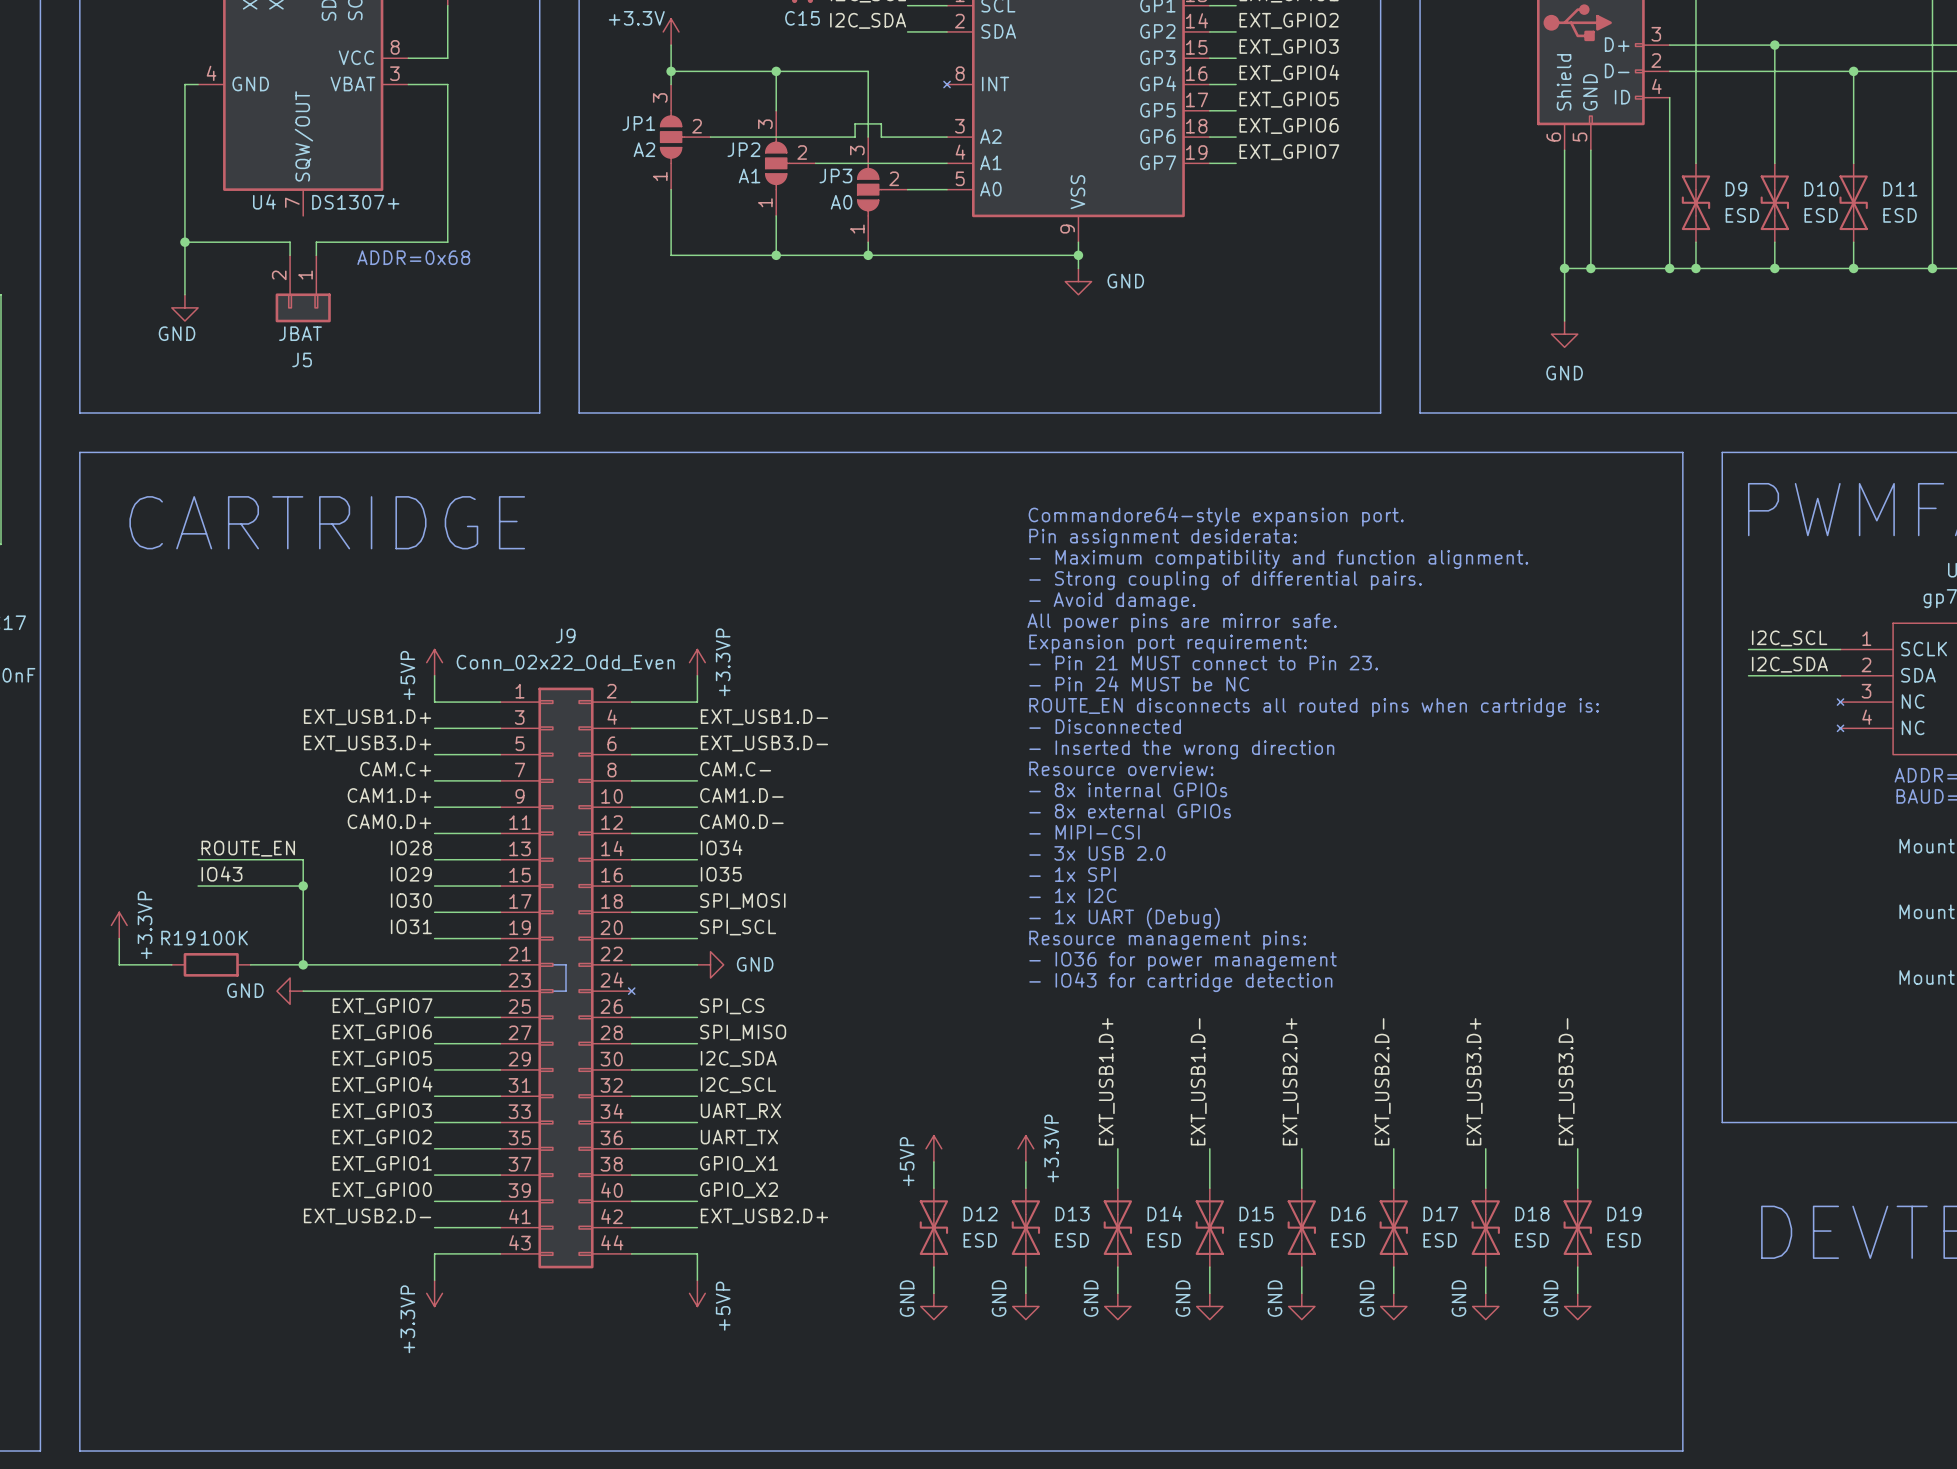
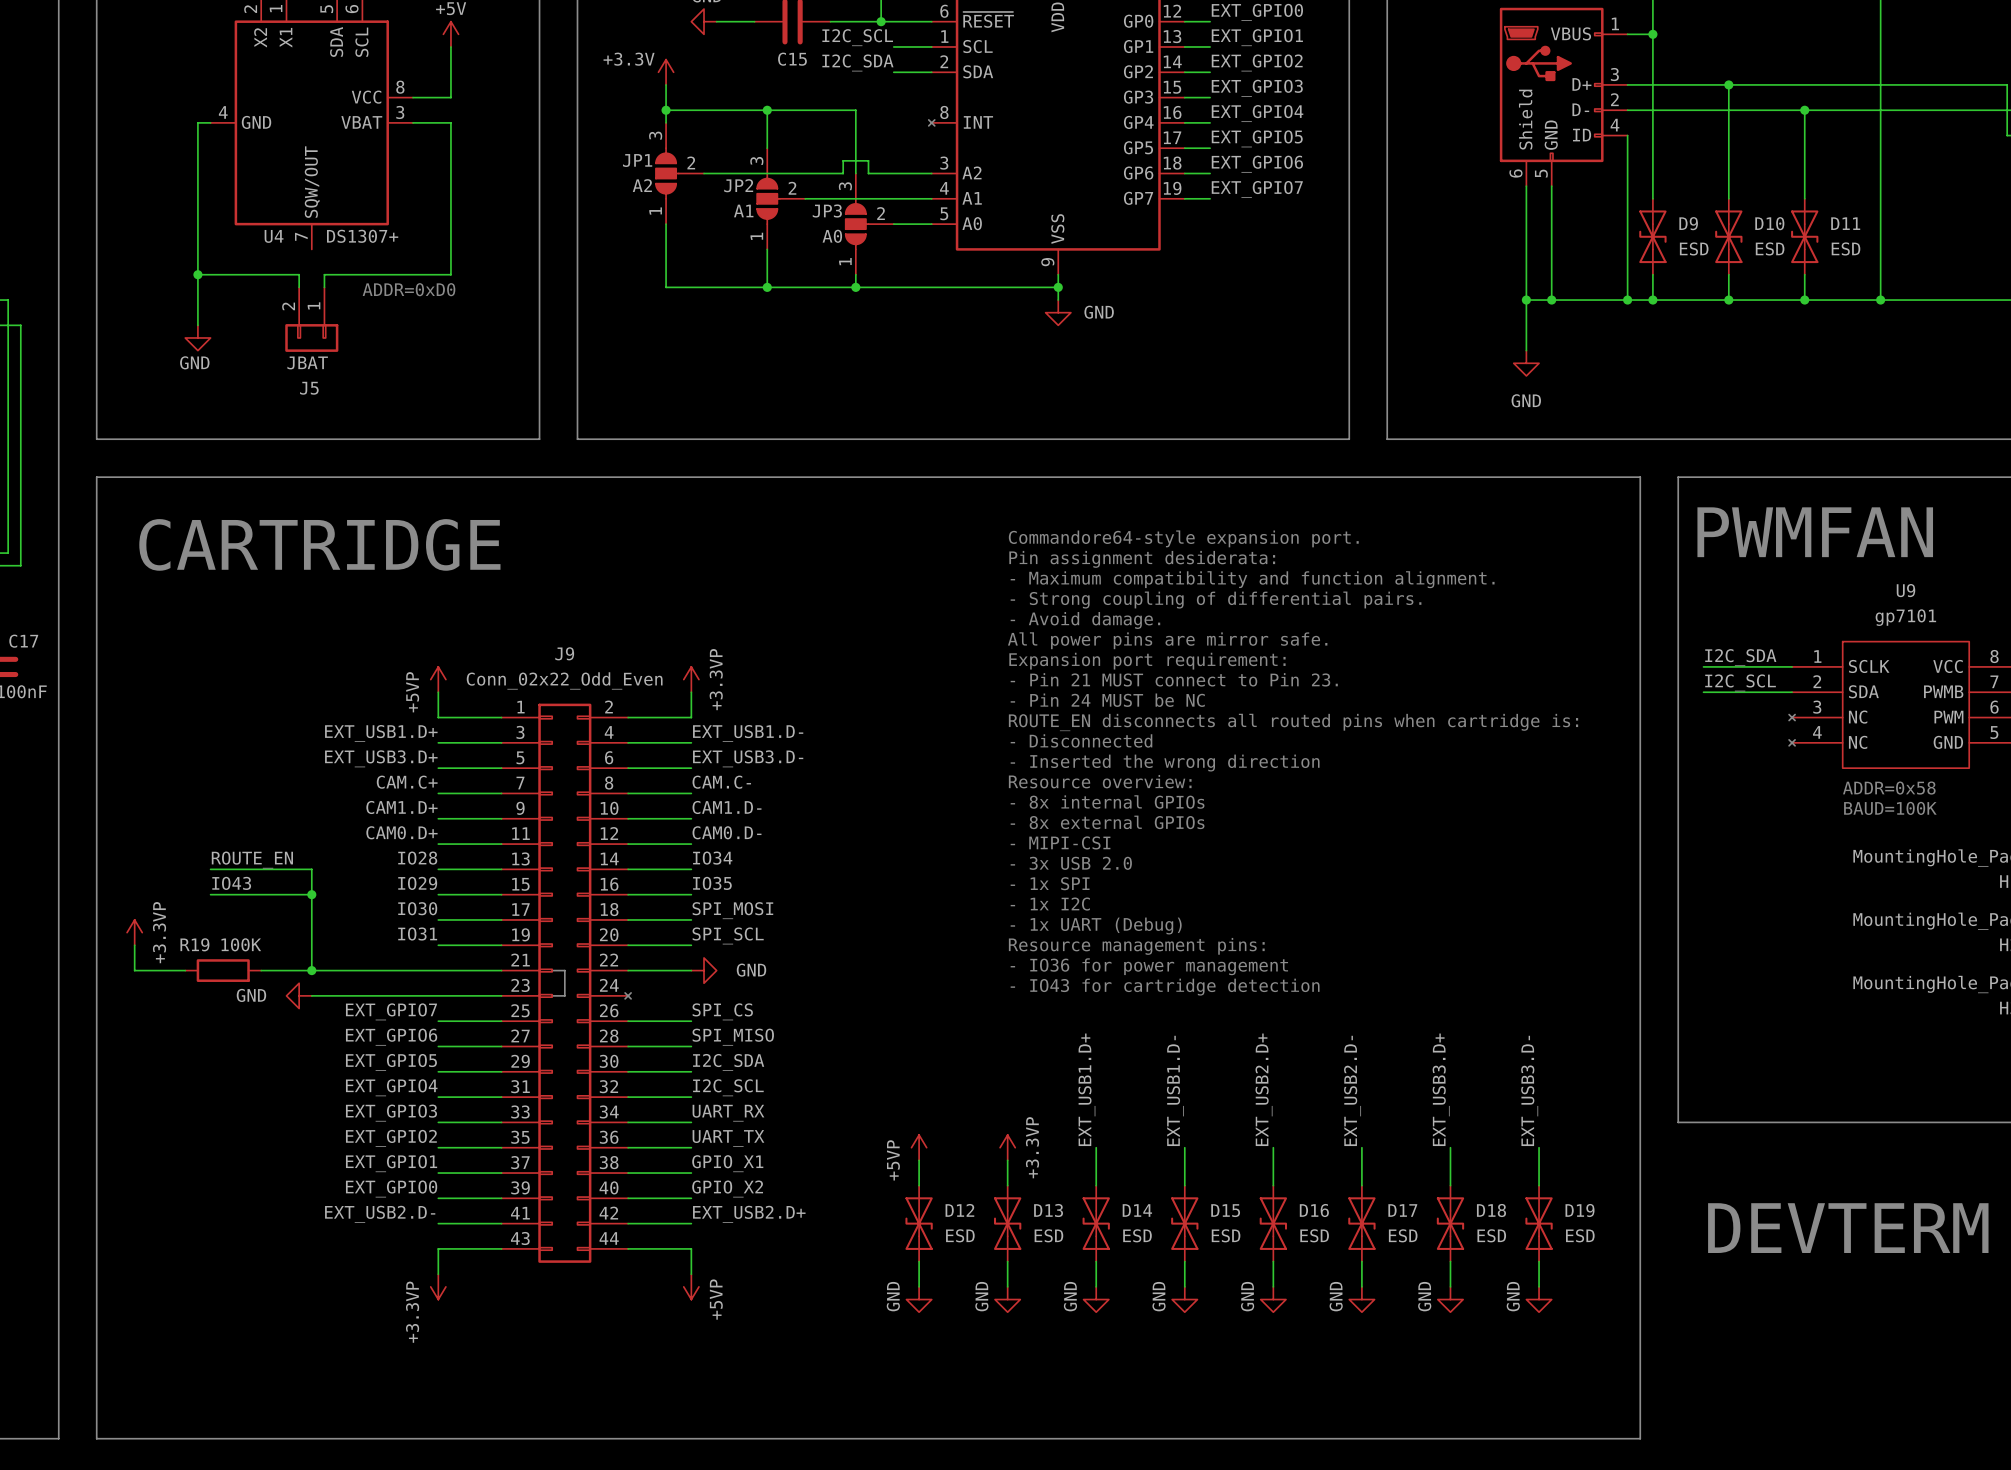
text: ADDR=0x68 (413, 257) -> ADDR=0xD0 (409, 289)
label: I2C_SCL (1789, 638) -> I2C_SDA (1740, 657)
label: I2C_SDA (1789, 664) -> I2C_SCL (1740, 682)

